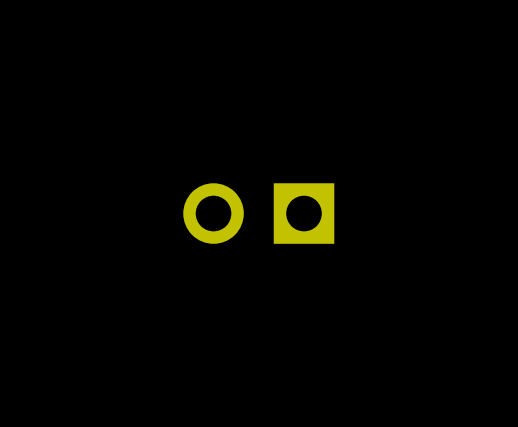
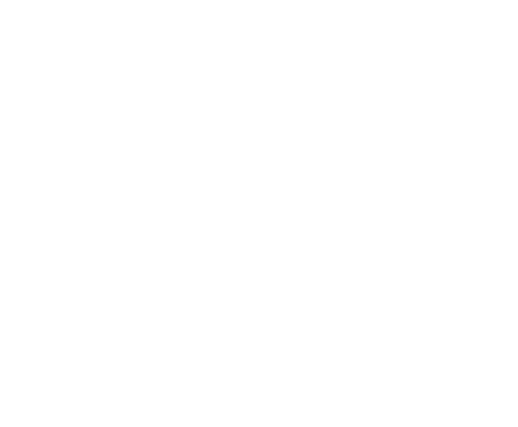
part: (258, 213) -> none

